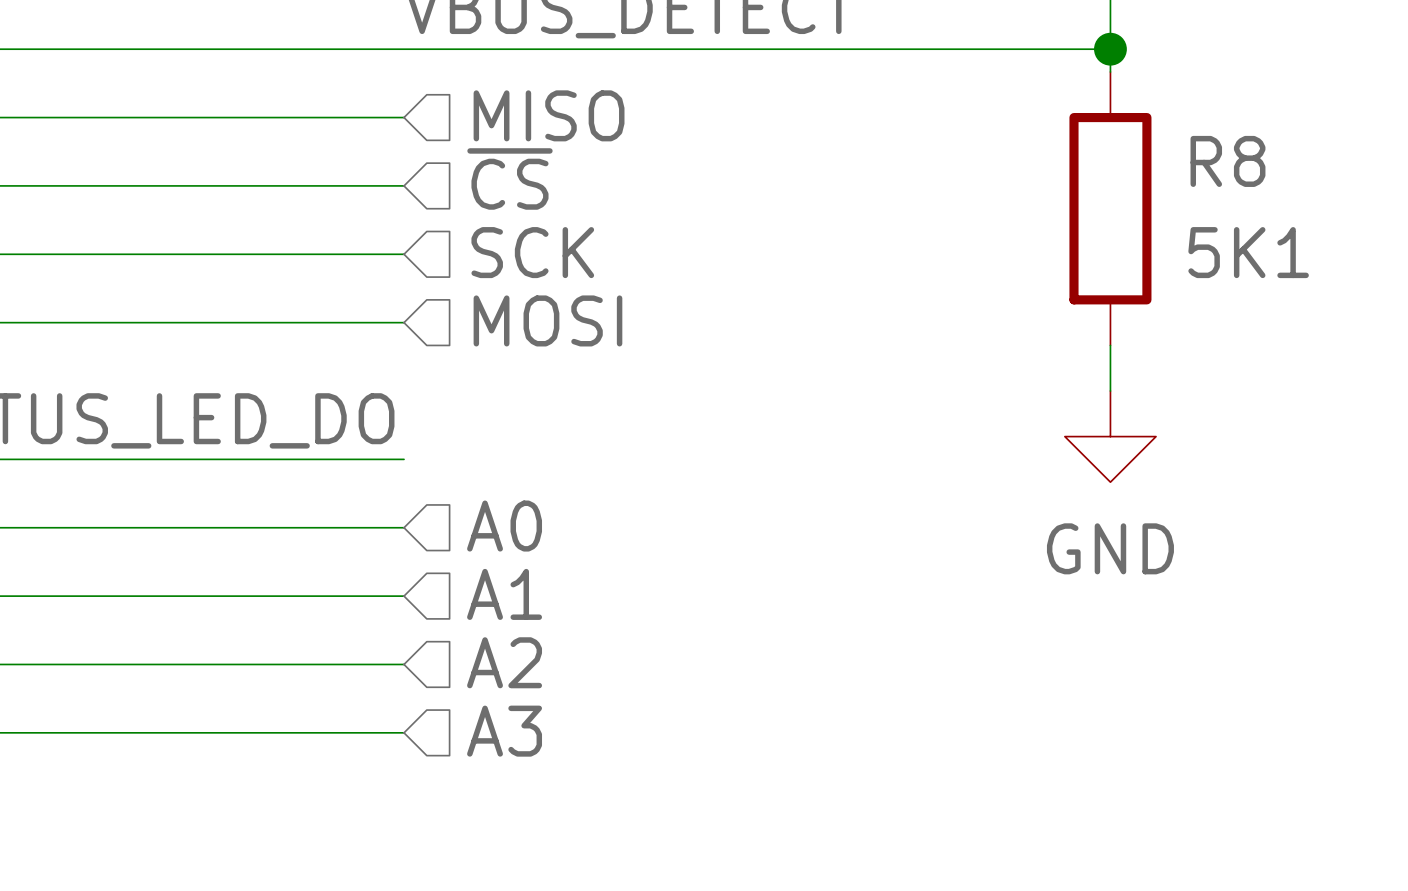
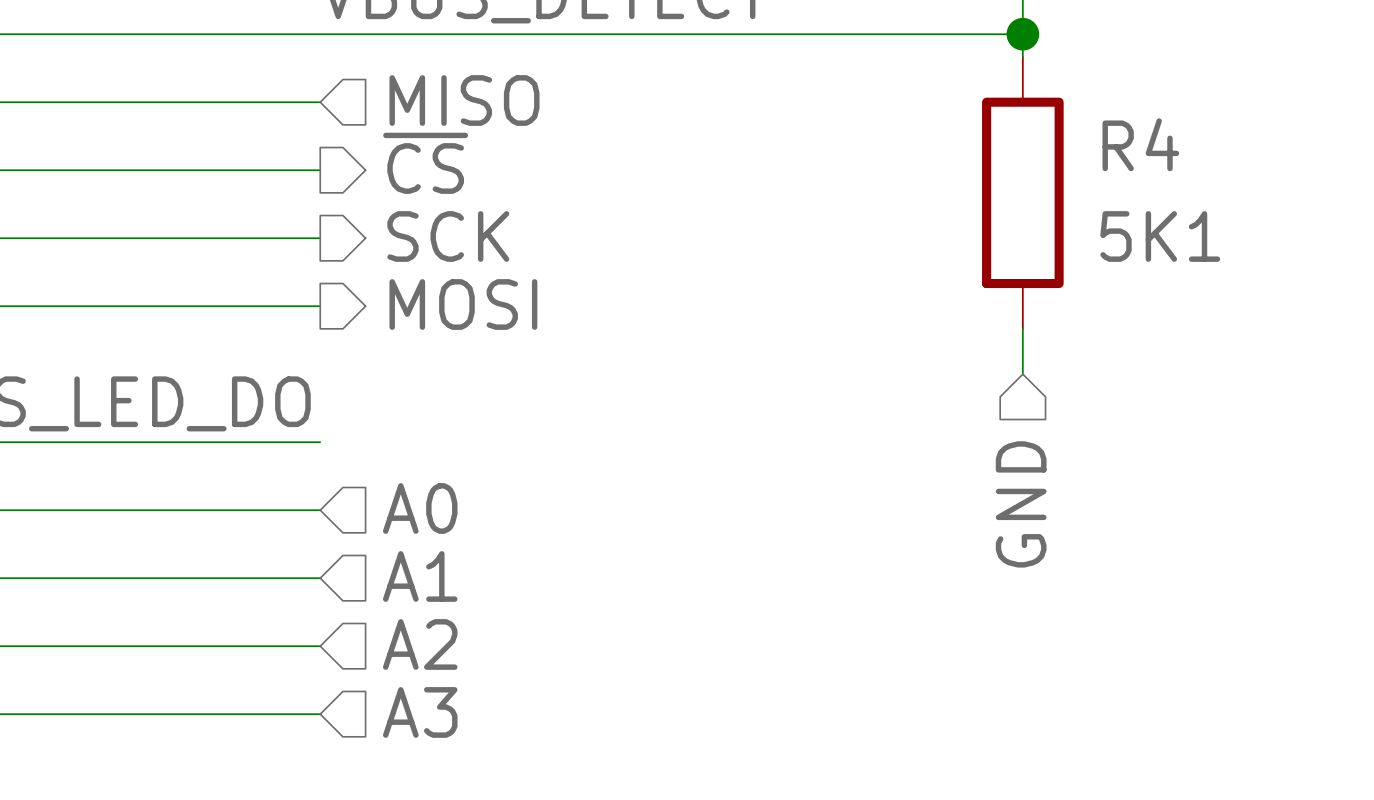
R8 name: R8 (1227, 161) -> R4 (1140, 144)
hierarchical label shape: input (509, 178) -> output (425, 163)
hierarchical label shape: input (532, 252) -> output (448, 236)
hierarchical label shape: input (547, 320) -> output (463, 304)
power symbol: GND (1110, 436) -> none
hierarchical label: none -> GND (1021, 504)

